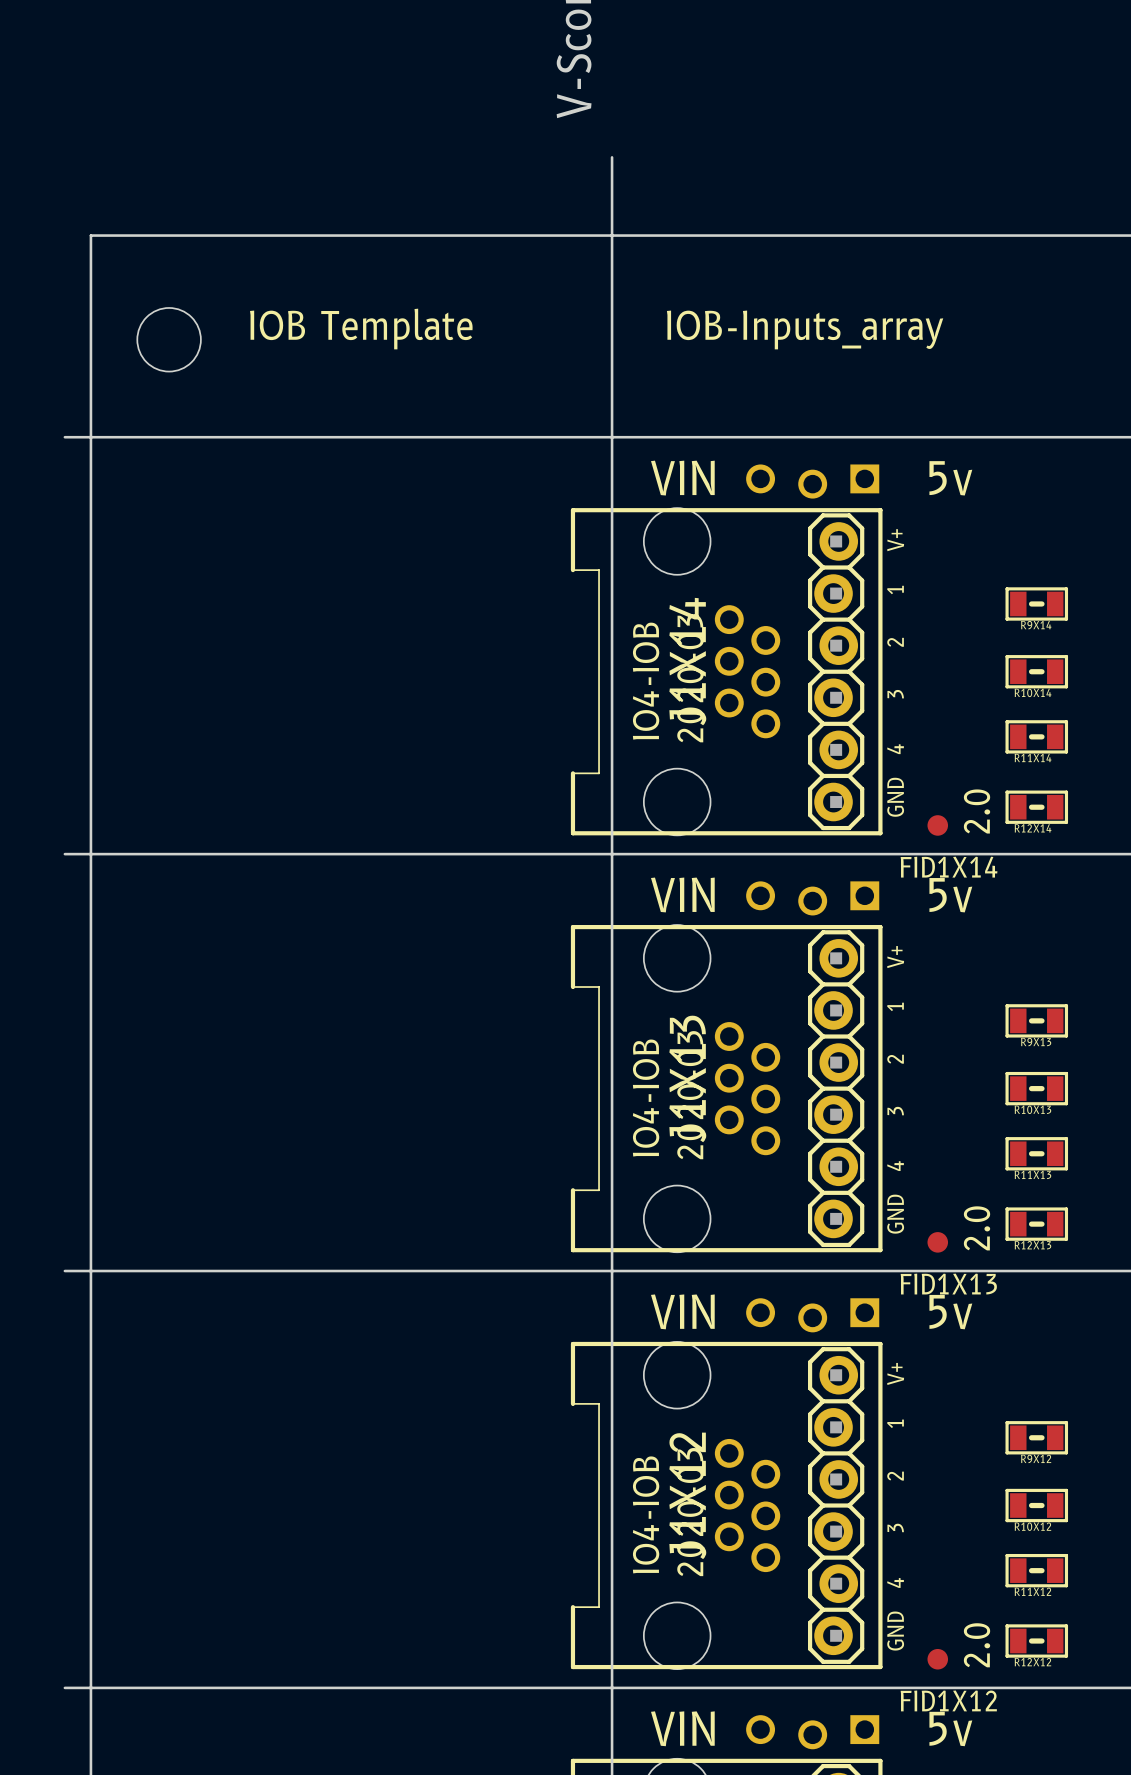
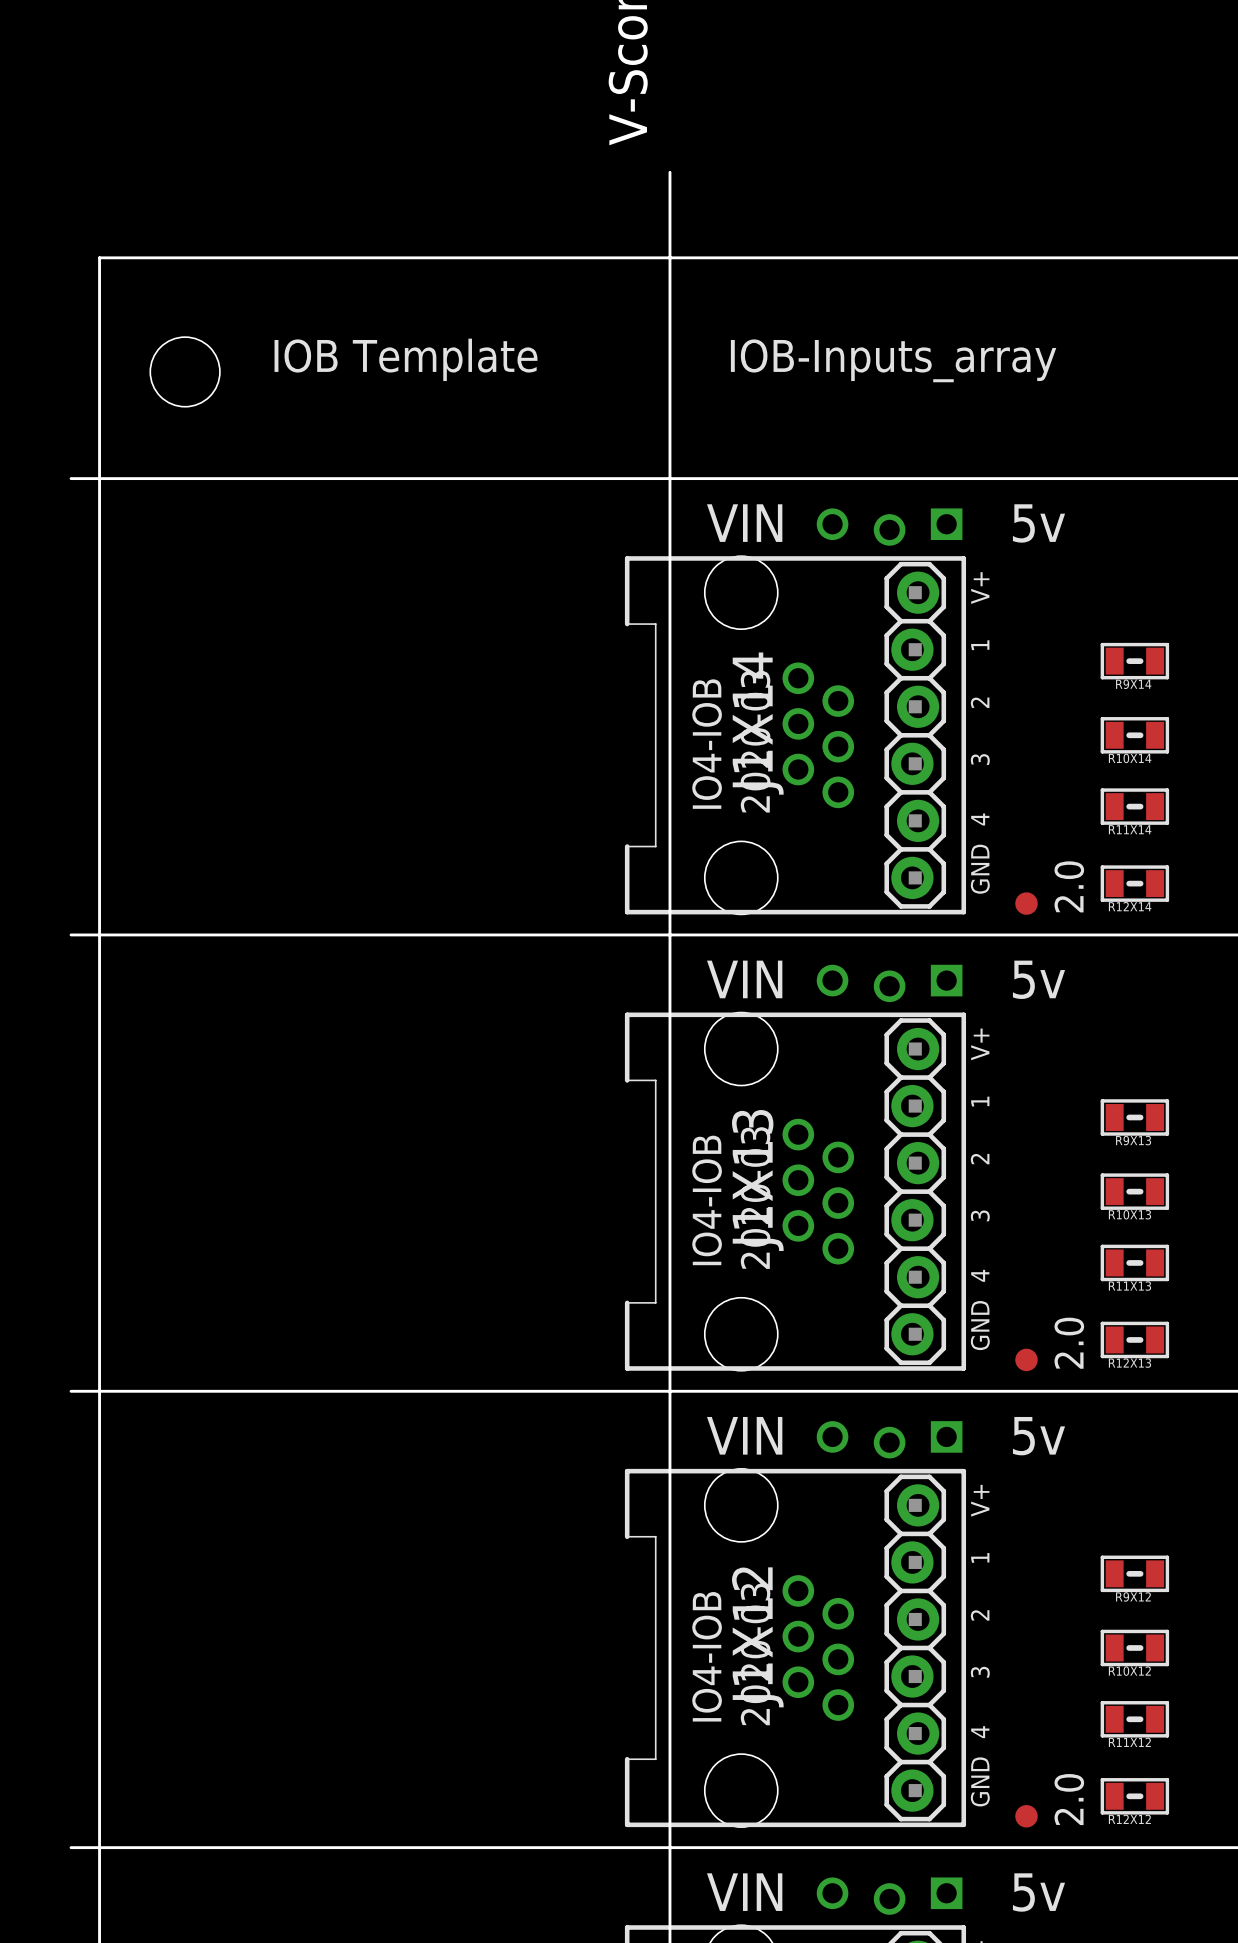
FID1X14 name: FID1X14 (949, 867) -> none
FID1X13 name: FID1X13 (948, 1284) -> none
FID1X12 name: FID1X12 (948, 1700) -> none

